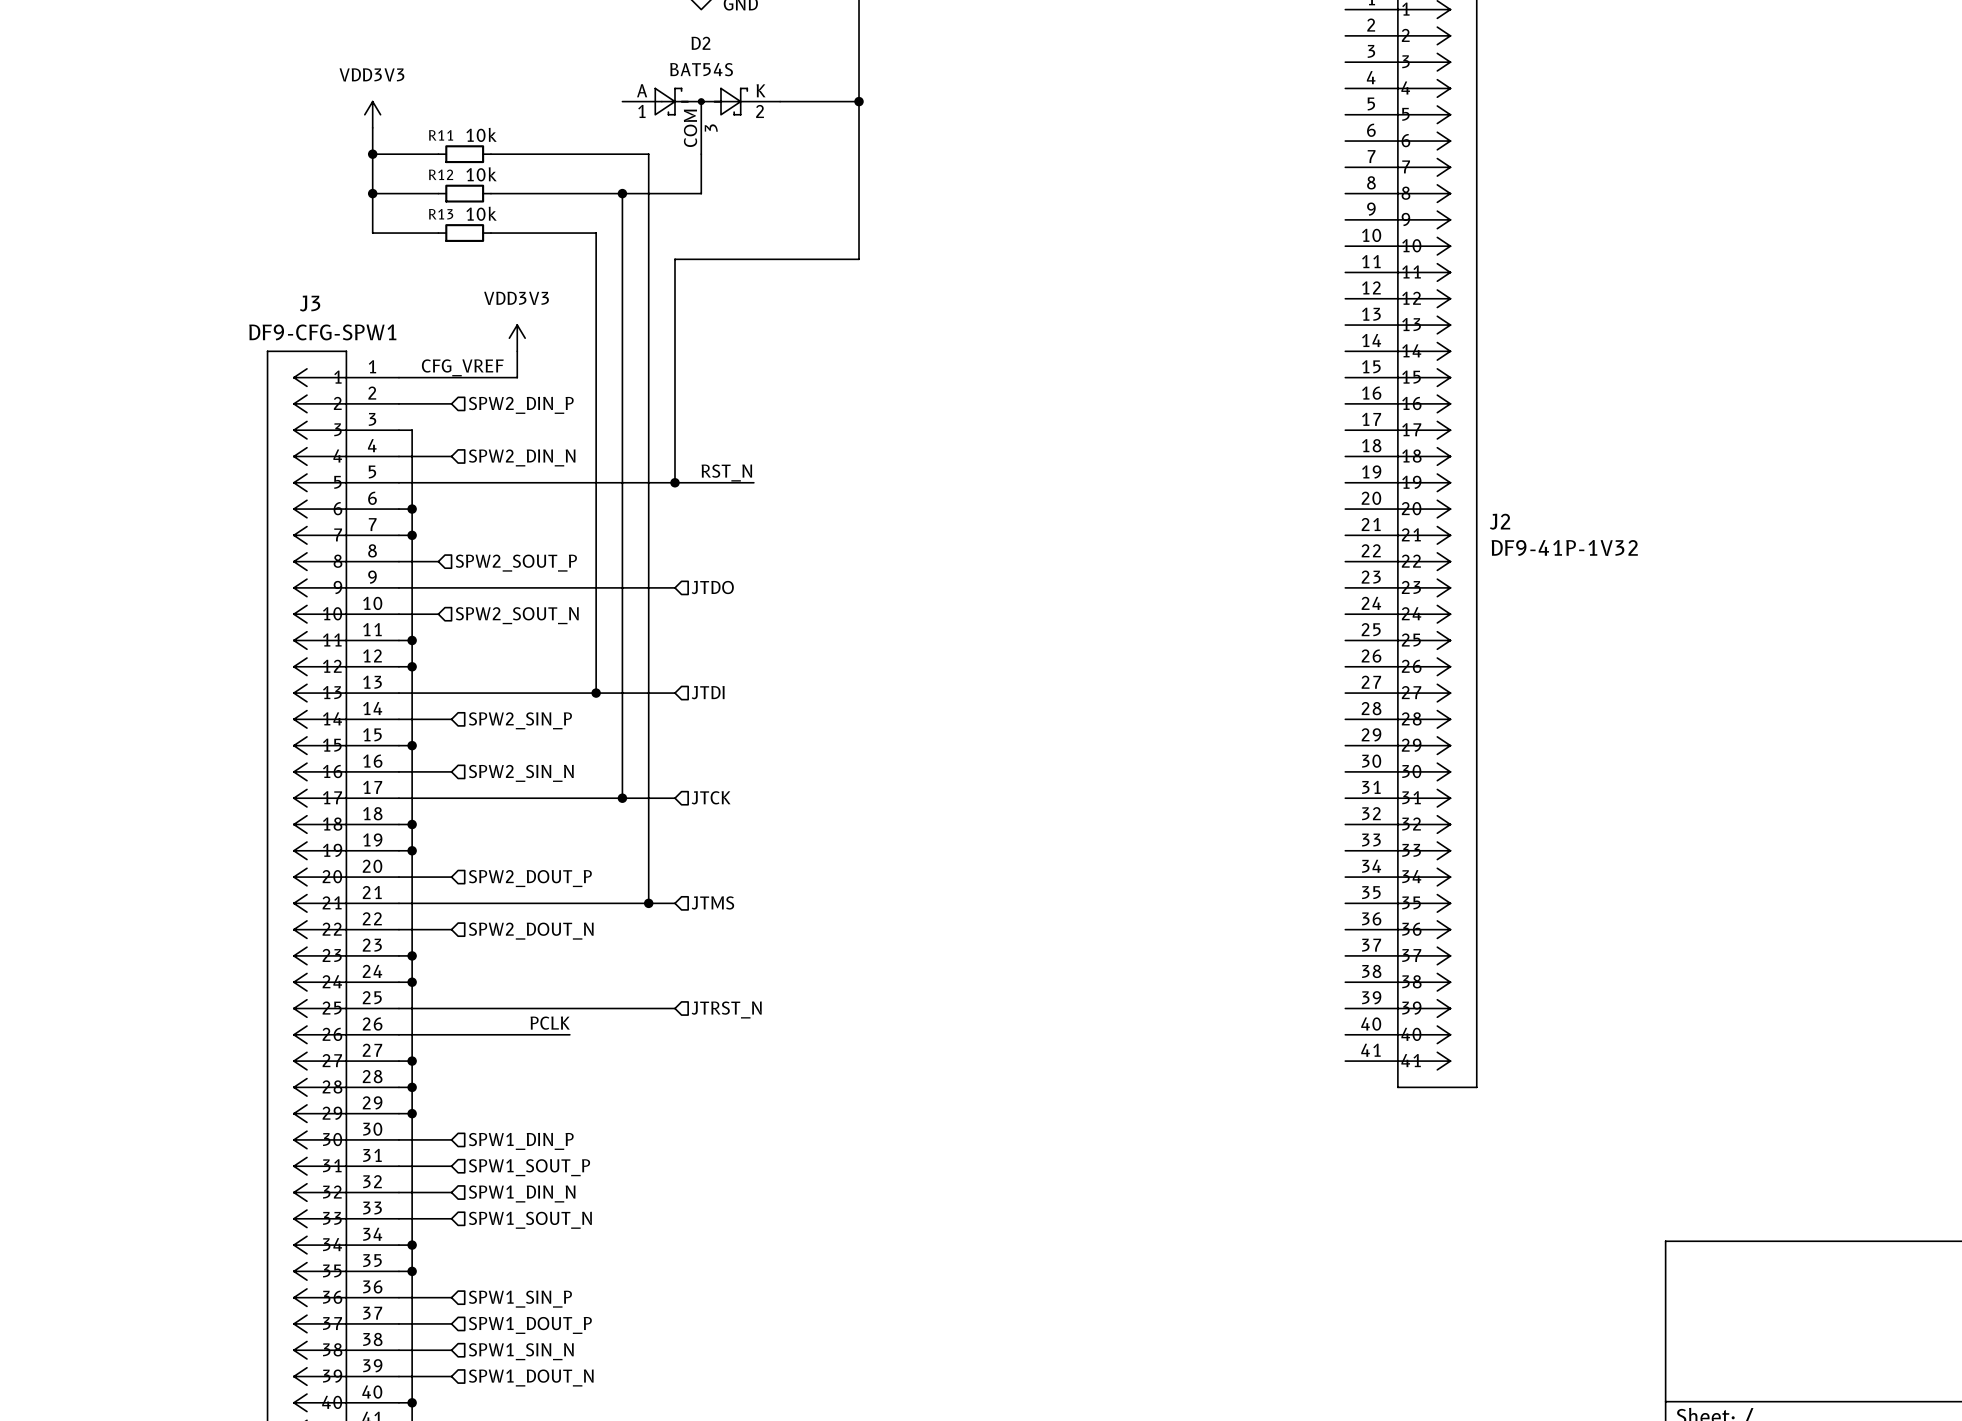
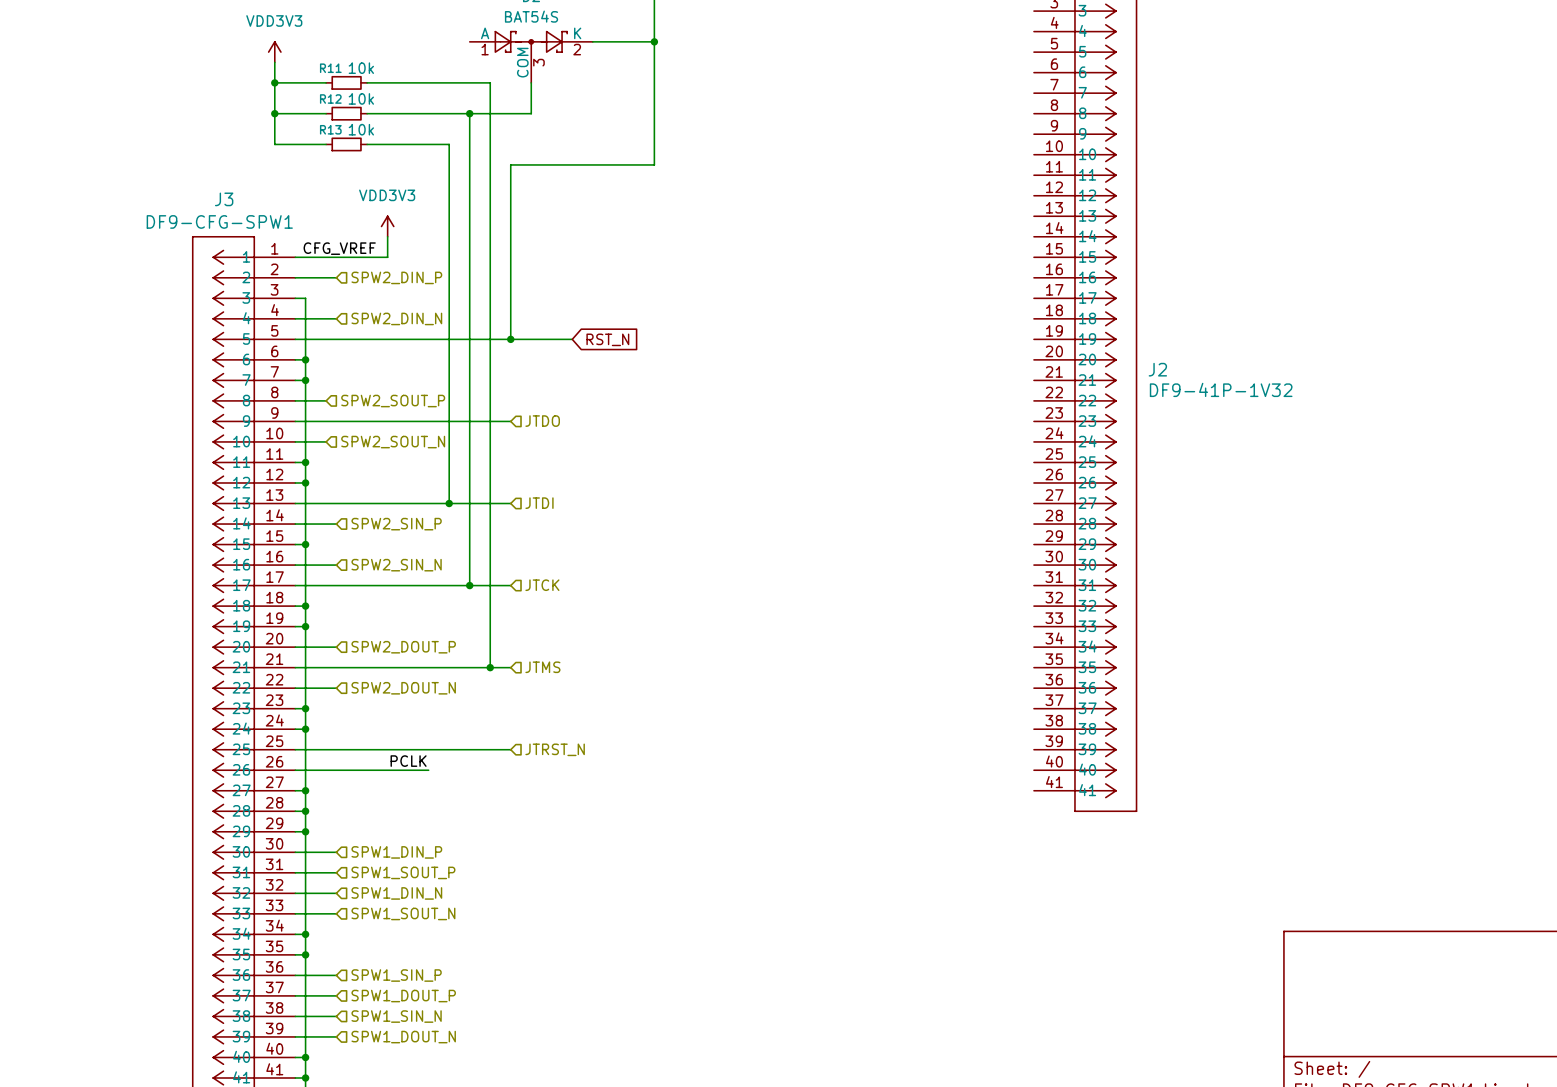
label: RST_N (726, 473) -> none
global label: none -> RST_N (607, 339)

